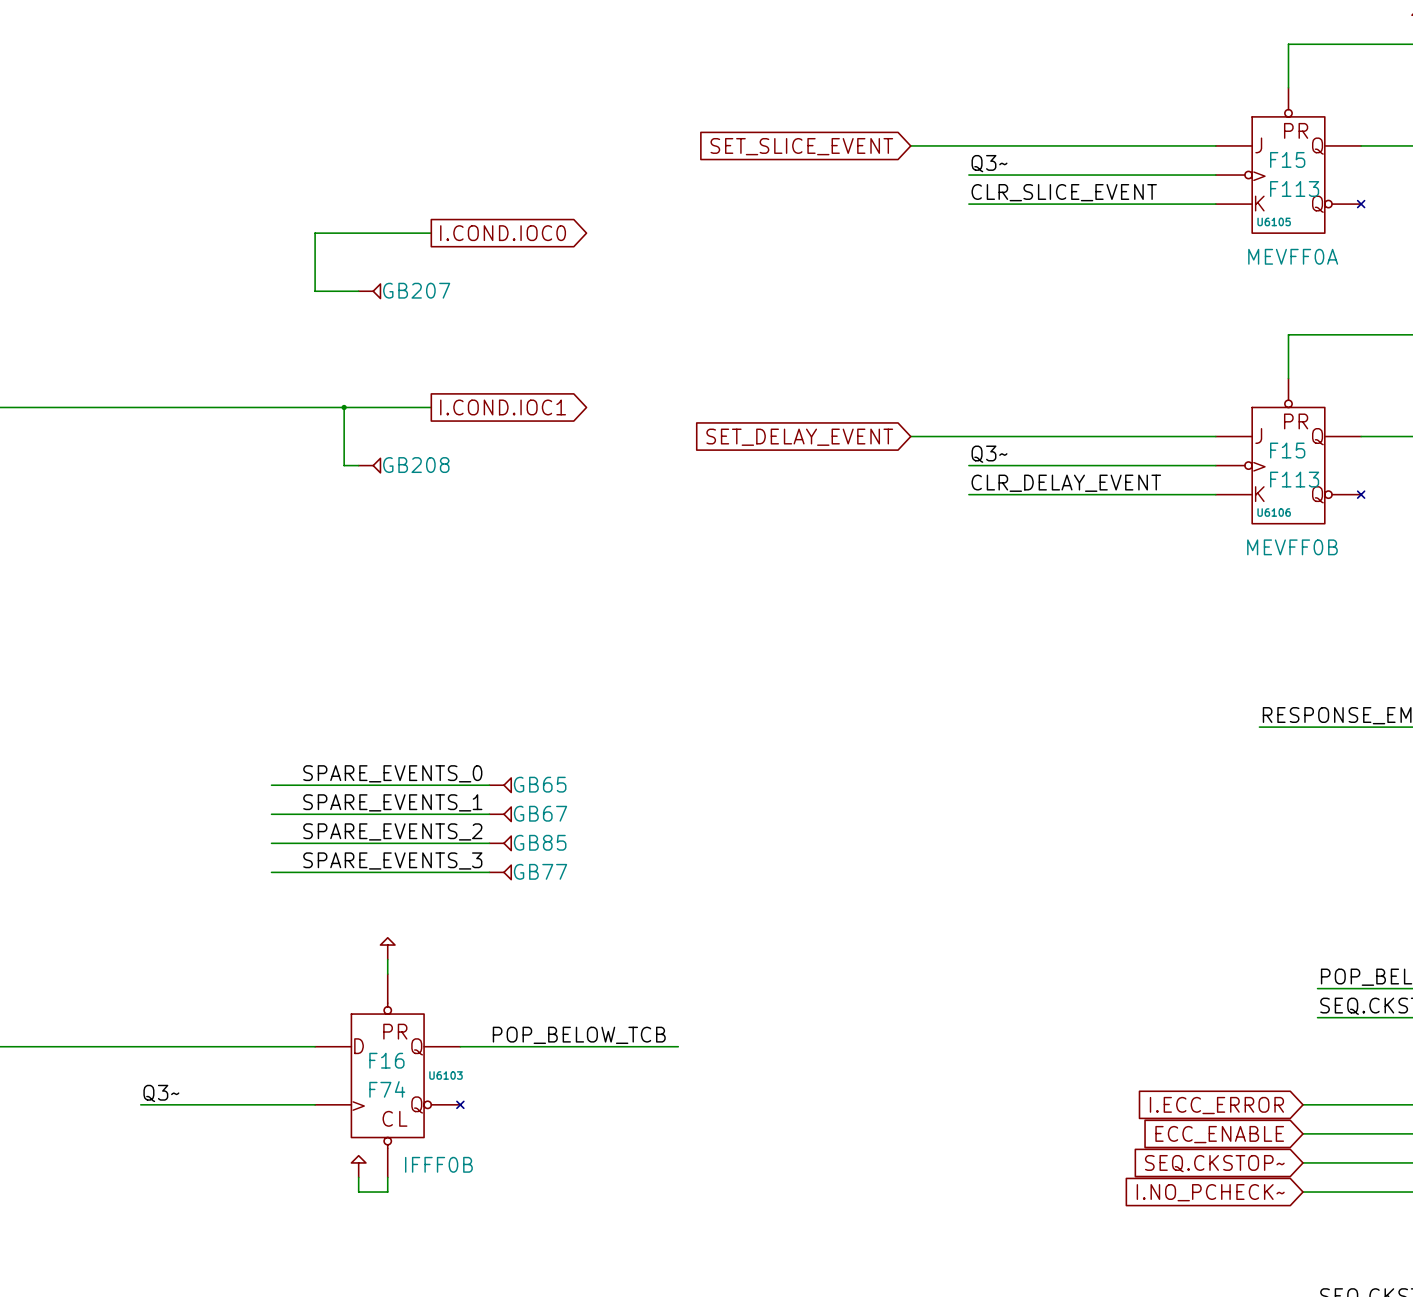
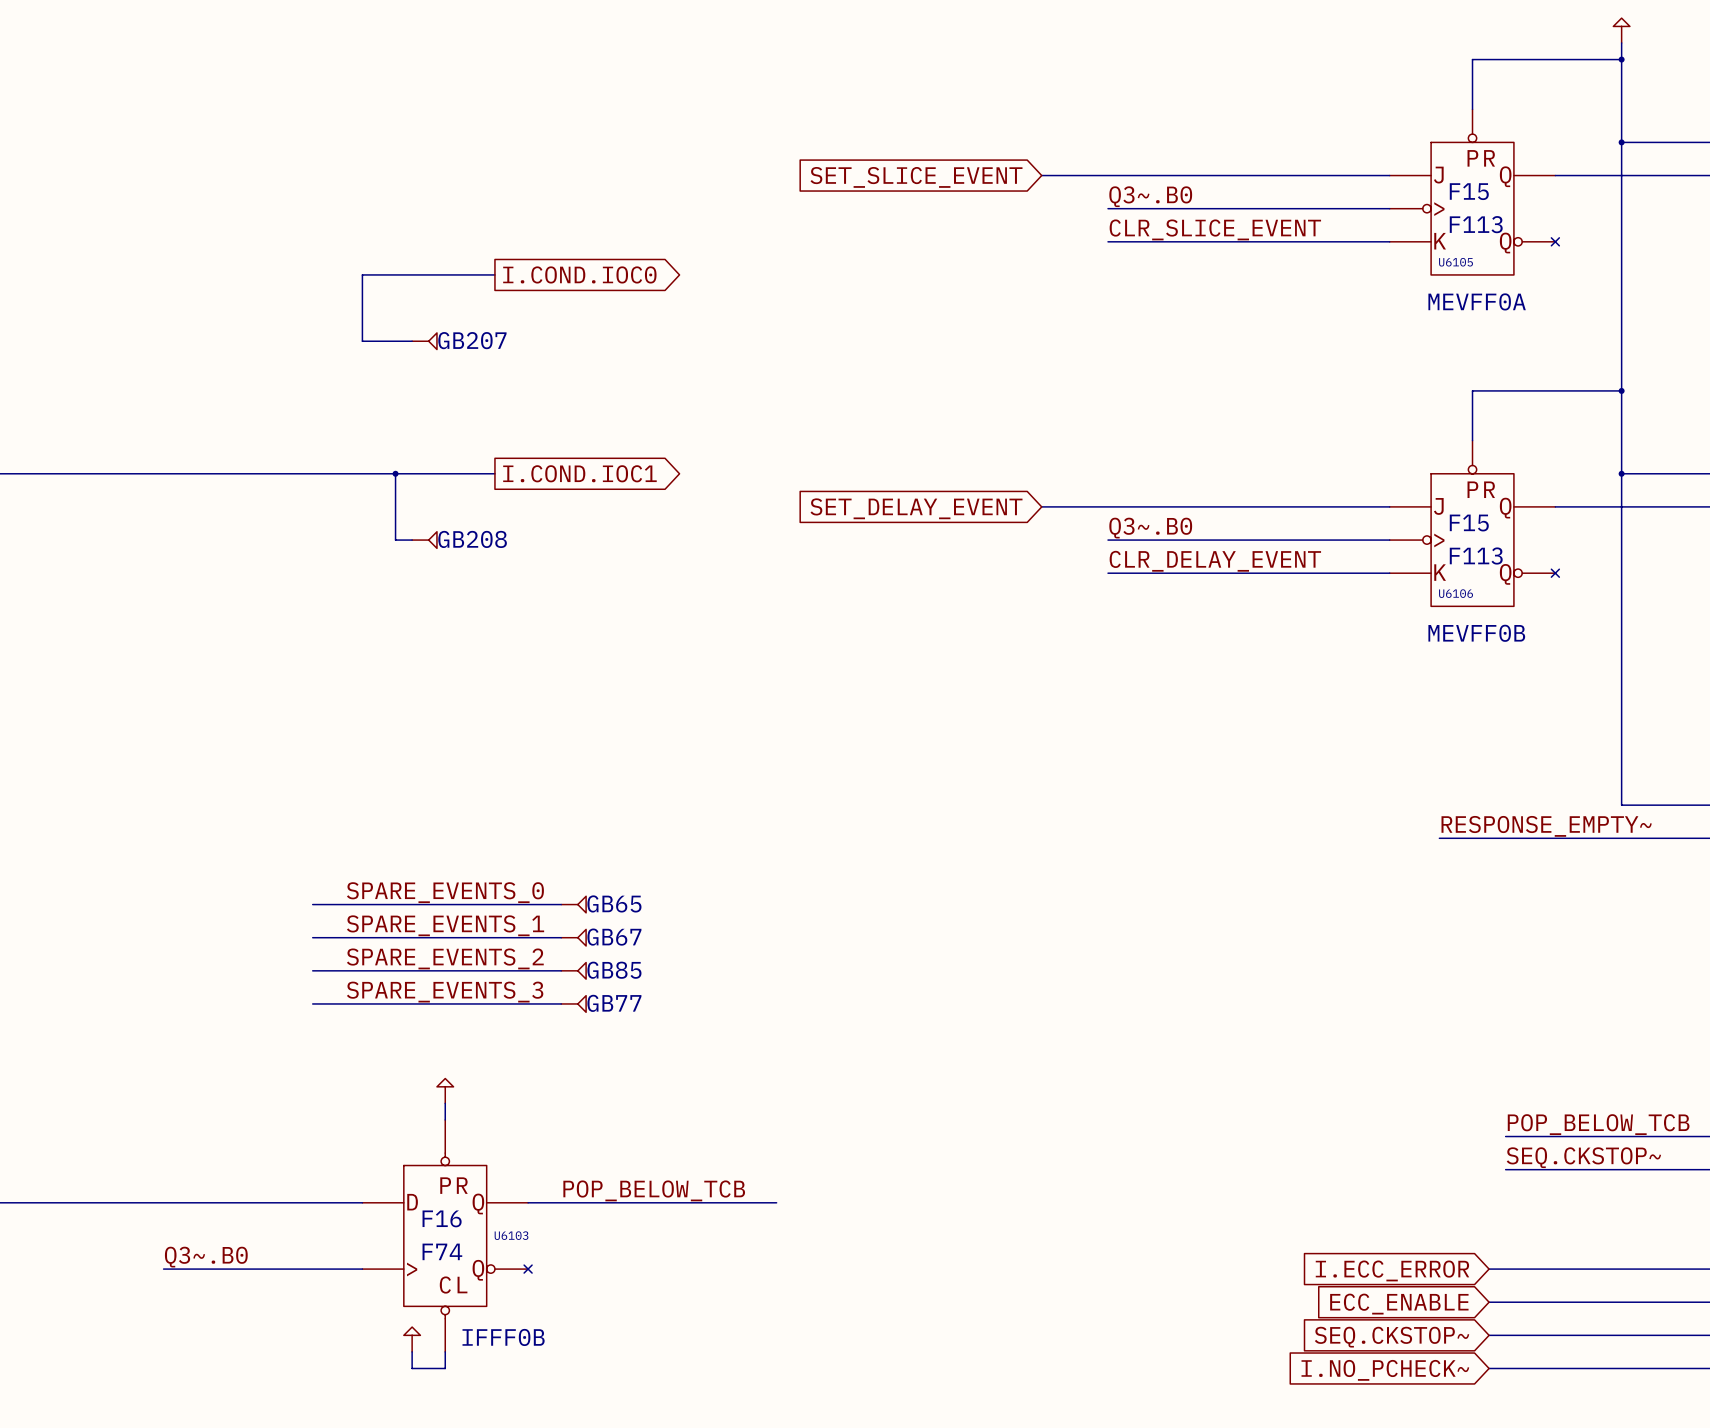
label: Q3~ (989, 163) -> Q3~.B0 (1150, 196)
label: Q3~ (989, 454) -> Q3~.B0 (1150, 528)
label: Q3~ (161, 1093) -> Q3~.B0 (206, 1257)

